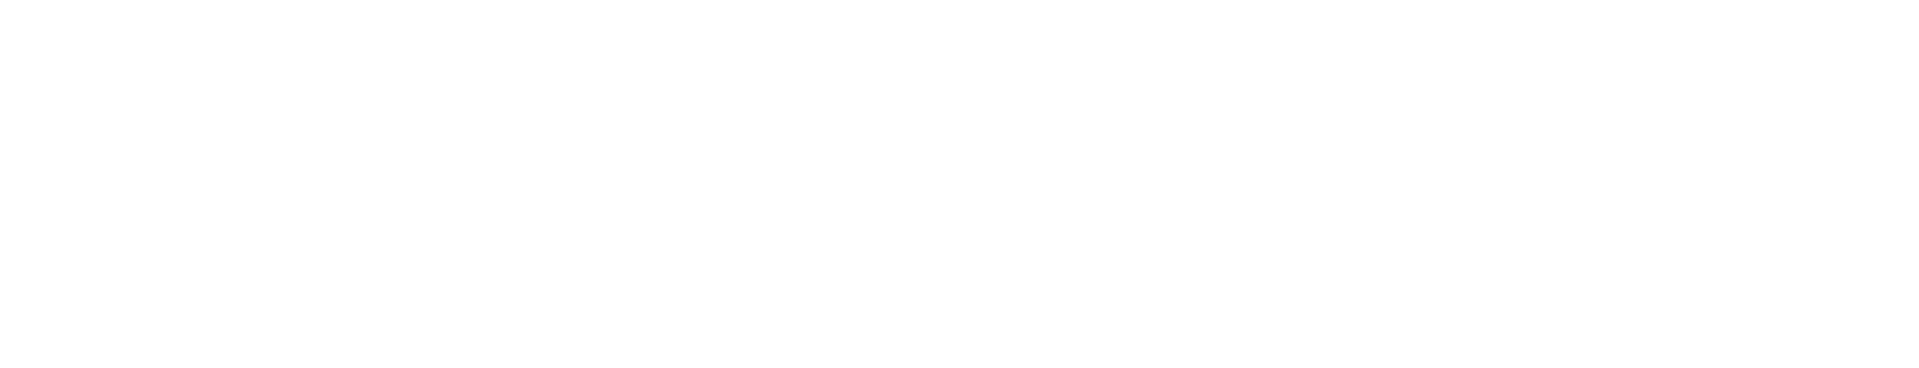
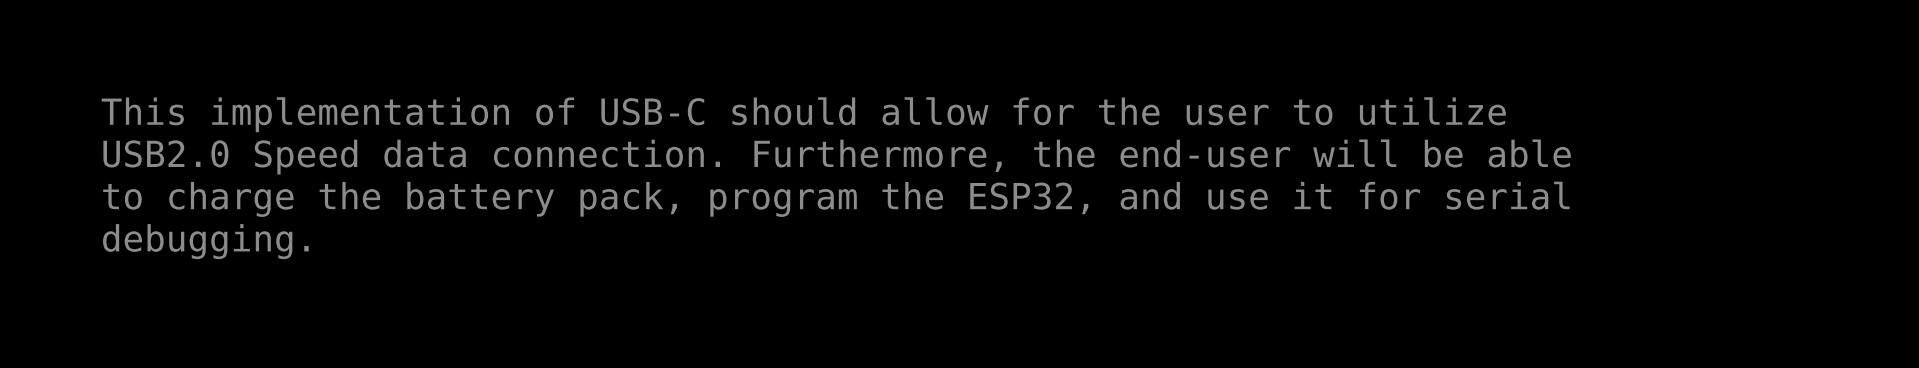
text: none -> This implementation of USB-C should allow for the user to utilize (803, 114)
text: none -> USB2.0 Speed data connection. Furthermore, the end-user will be able (837, 156)
text: none -> to charge the battery pack, program the ESP32, and use it for serial (836, 199)
text: none -> debugging. (205, 241)

